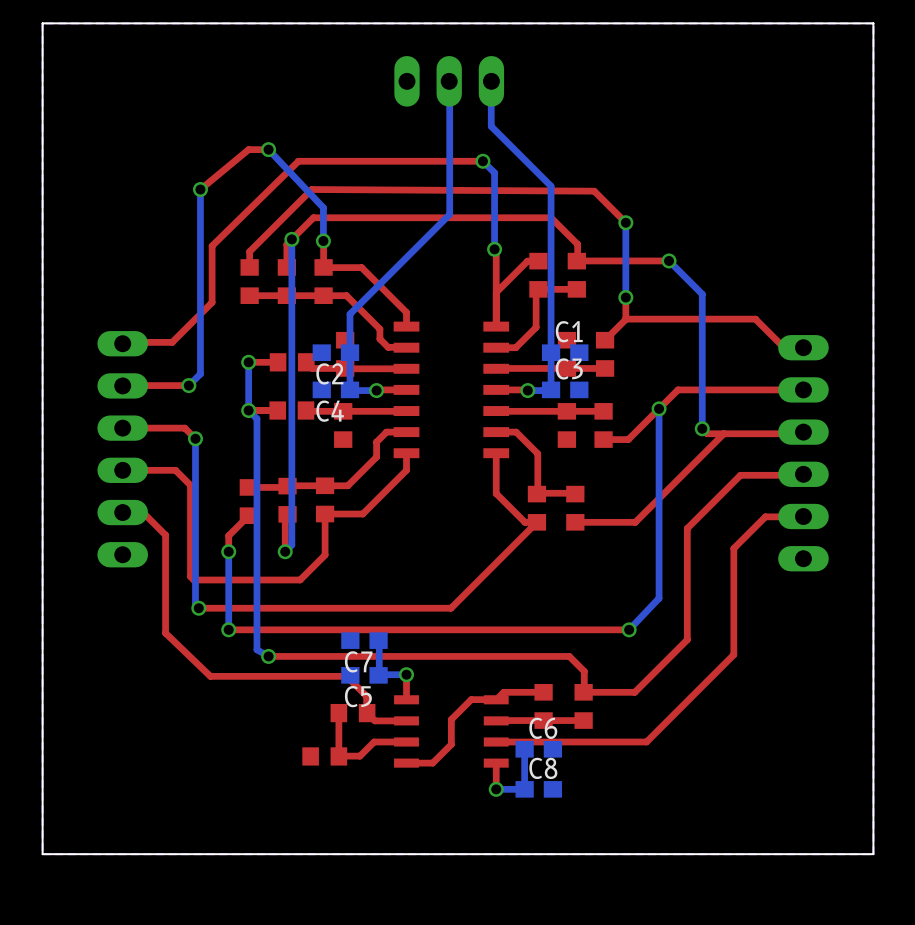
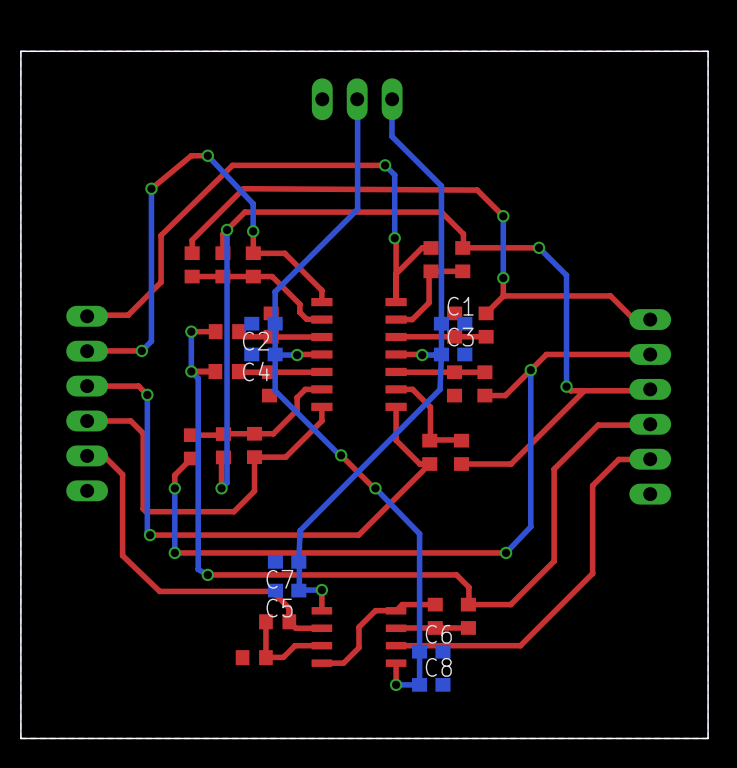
bottom track: none -> (275, 354) (275, 390) (341, 455)
bottom track: none -> (441, 354) (440, 389) (300, 530) (298, 561)
top track: none -> (341, 455) (375, 488)
via: none -> (341, 455)
bottom track: none -> (375, 488) (419, 533) (419, 651)
via: none -> (375, 488)

